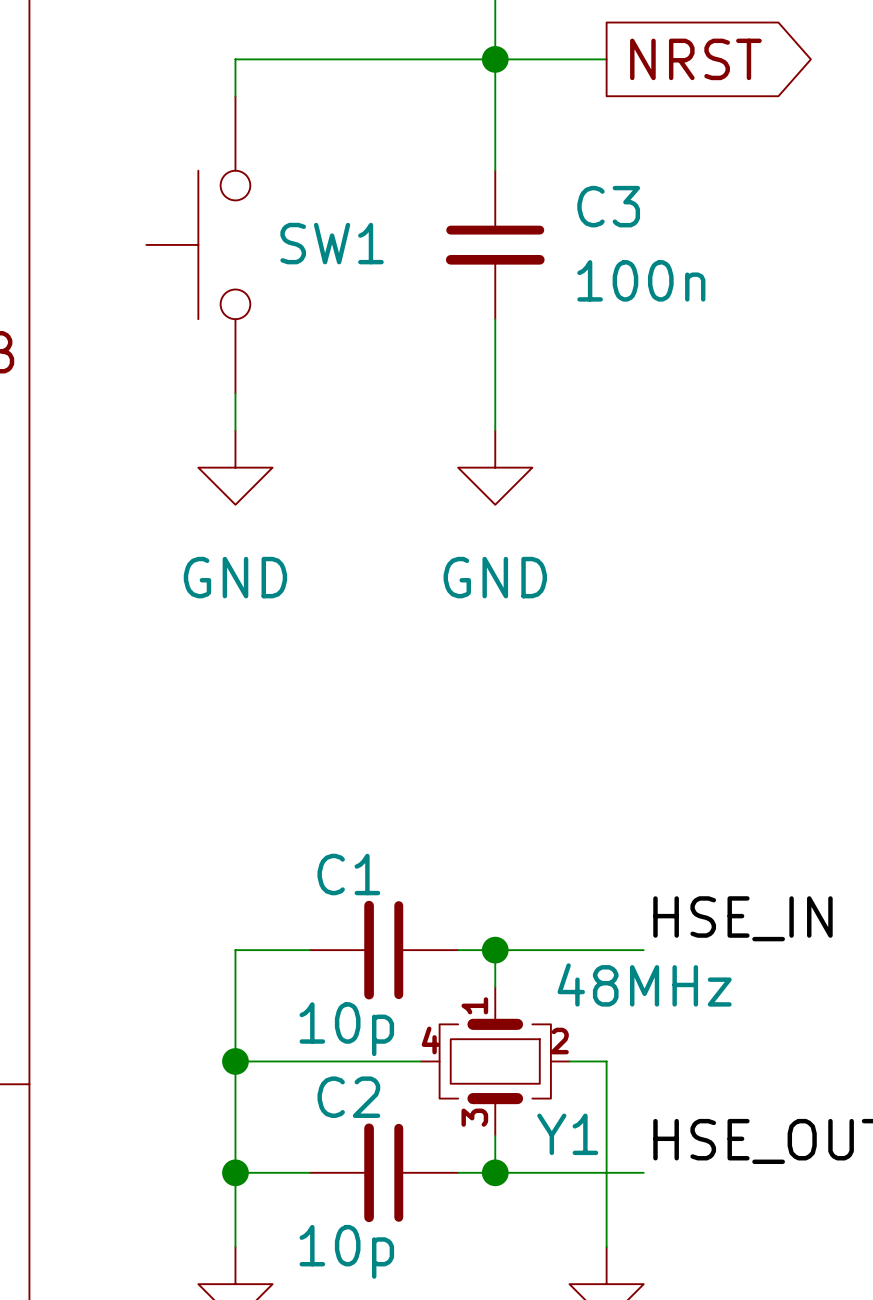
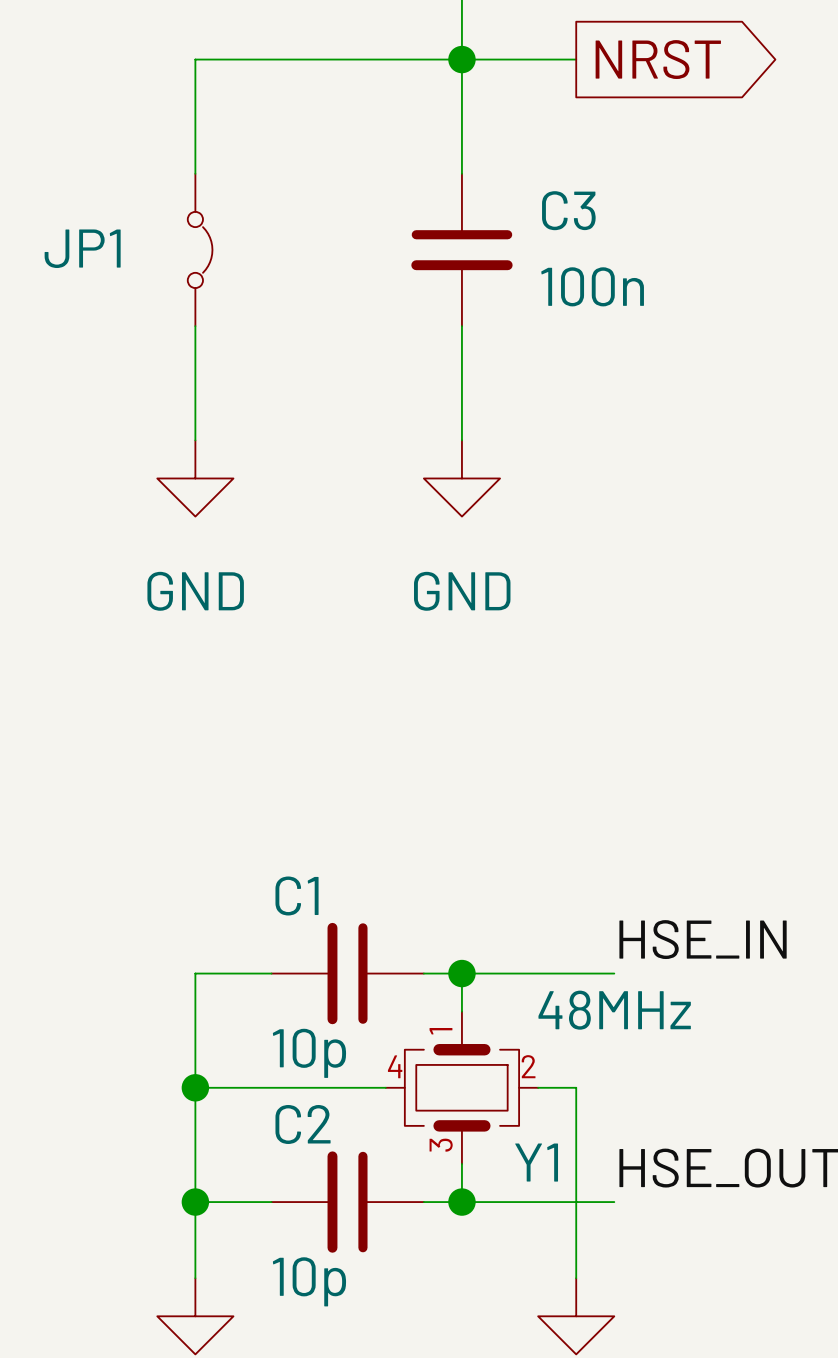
SW1: (198, 244) -> none
JP1: none -> (200, 249)

